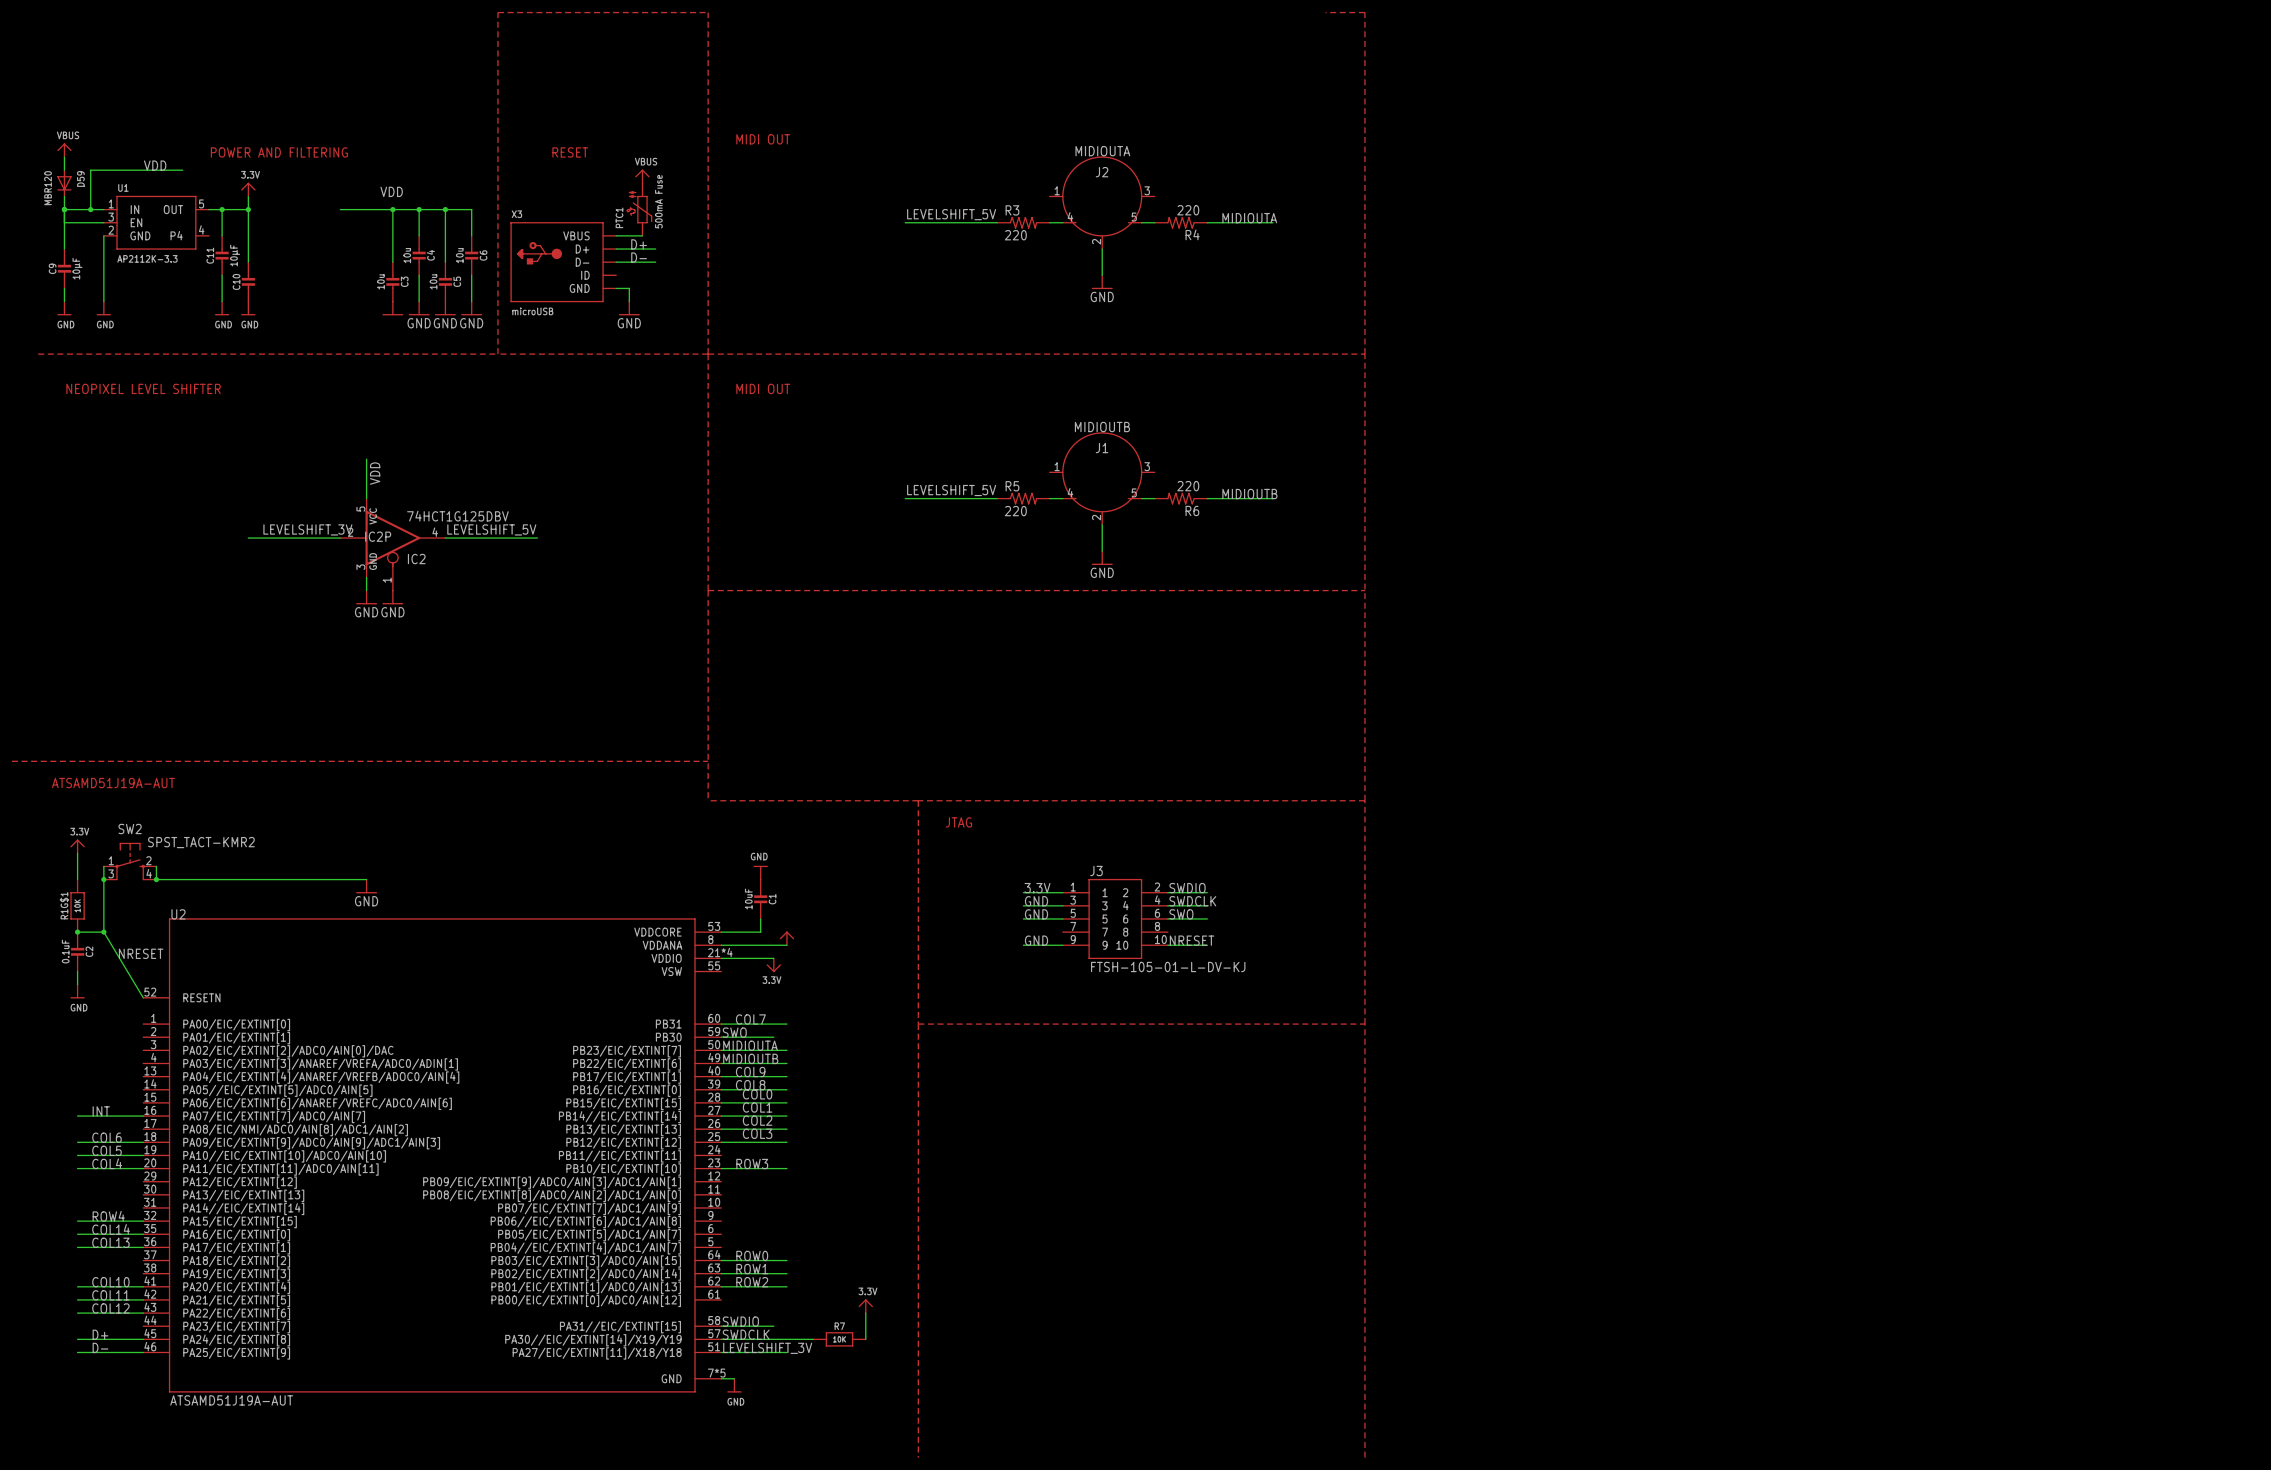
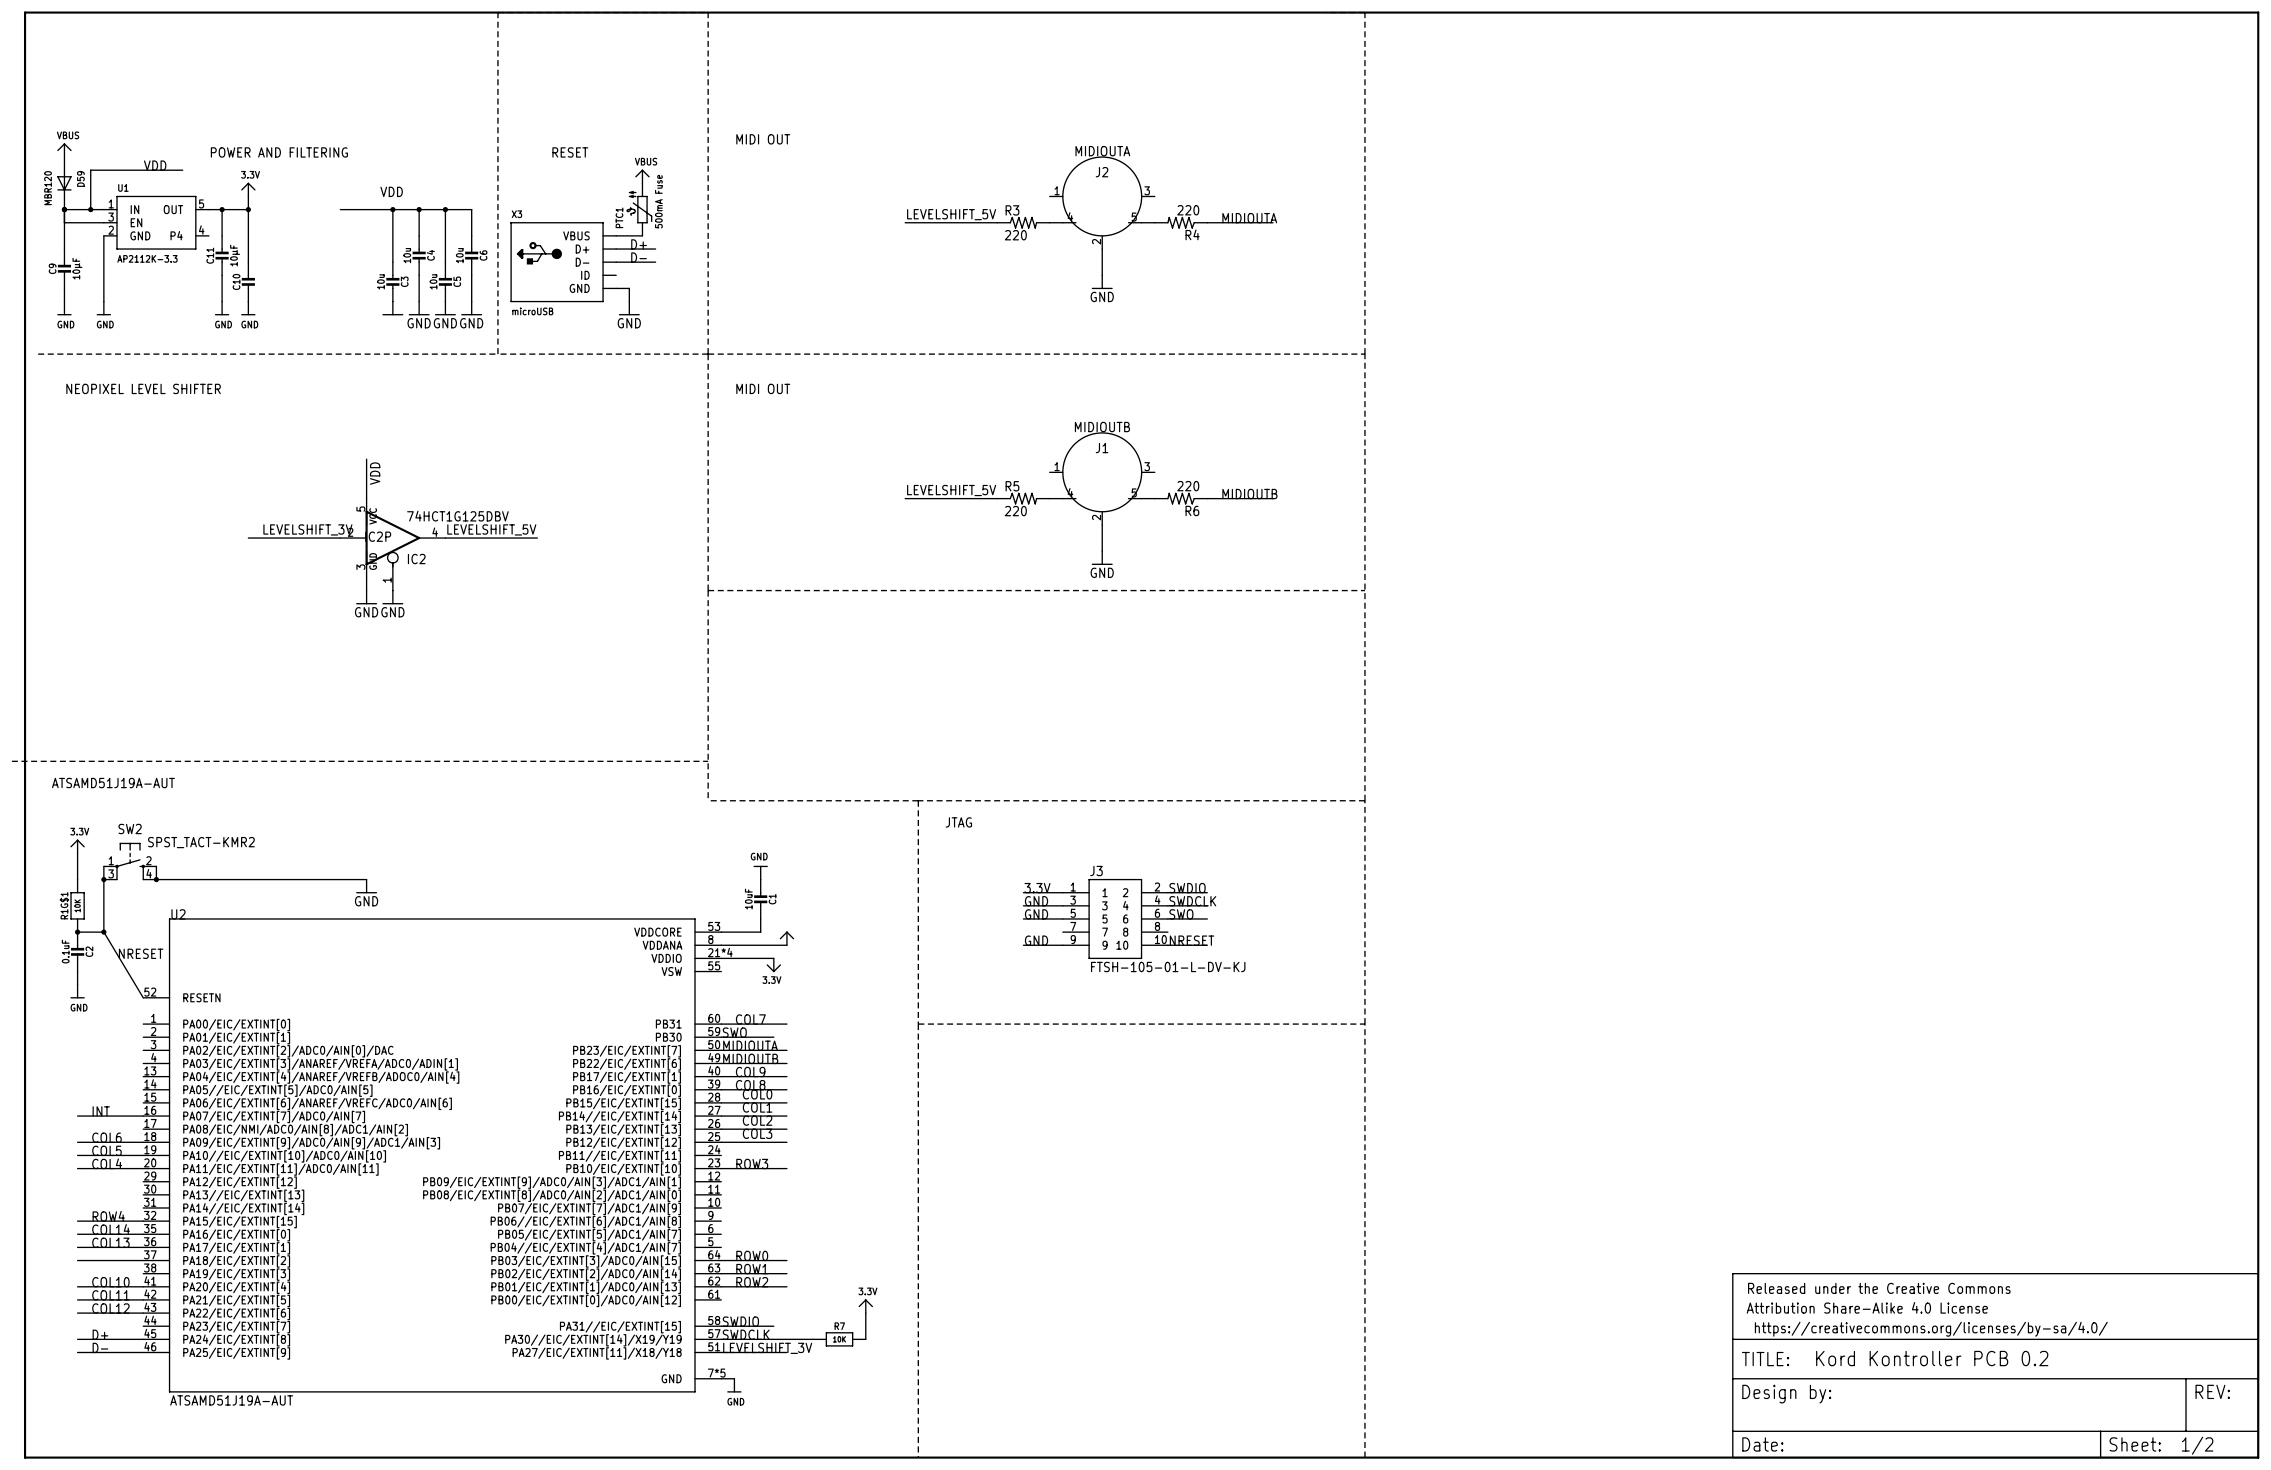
part: none -> (1141, 735)
wire: none -> (77, 1260) (143, 1260)
part: none -> (1995, 1365)

